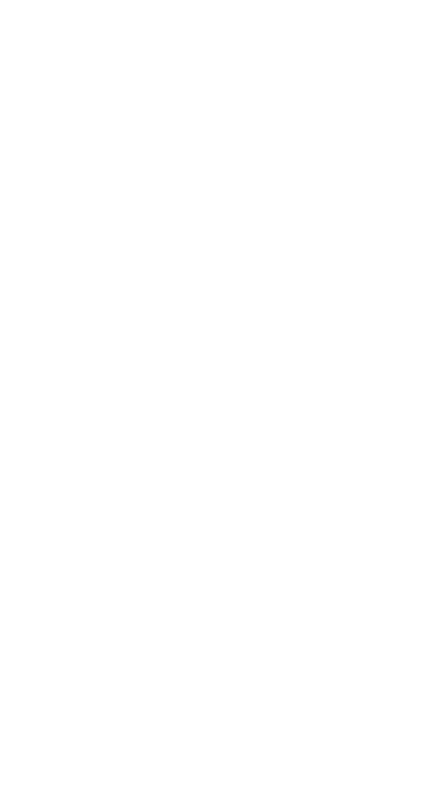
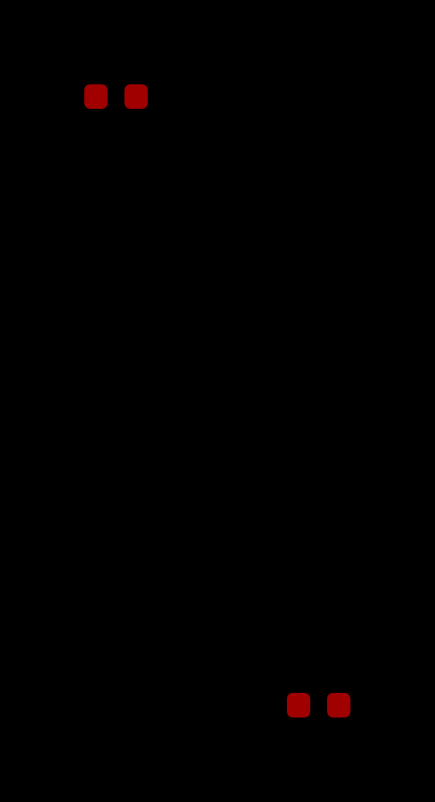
part: none -> (116, 96)
part: none -> (318, 705)

